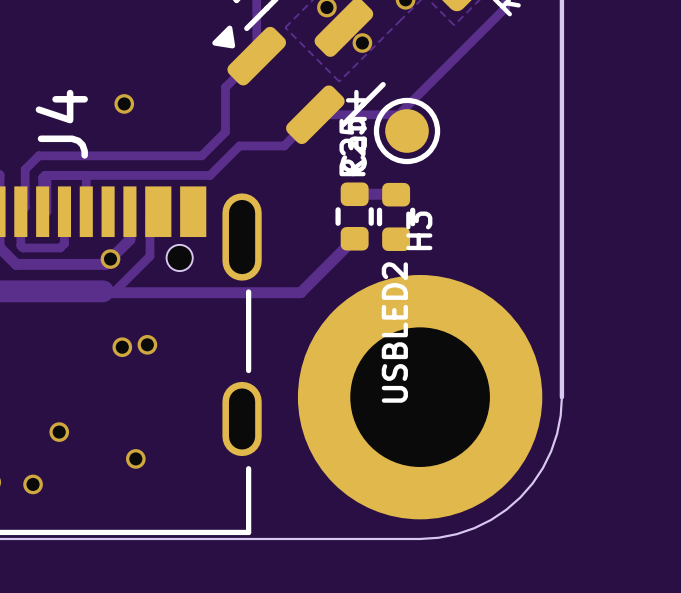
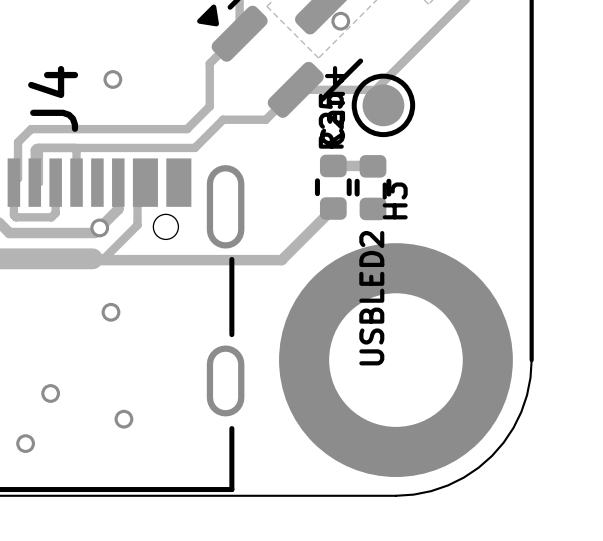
via: (147, 344) -> none

